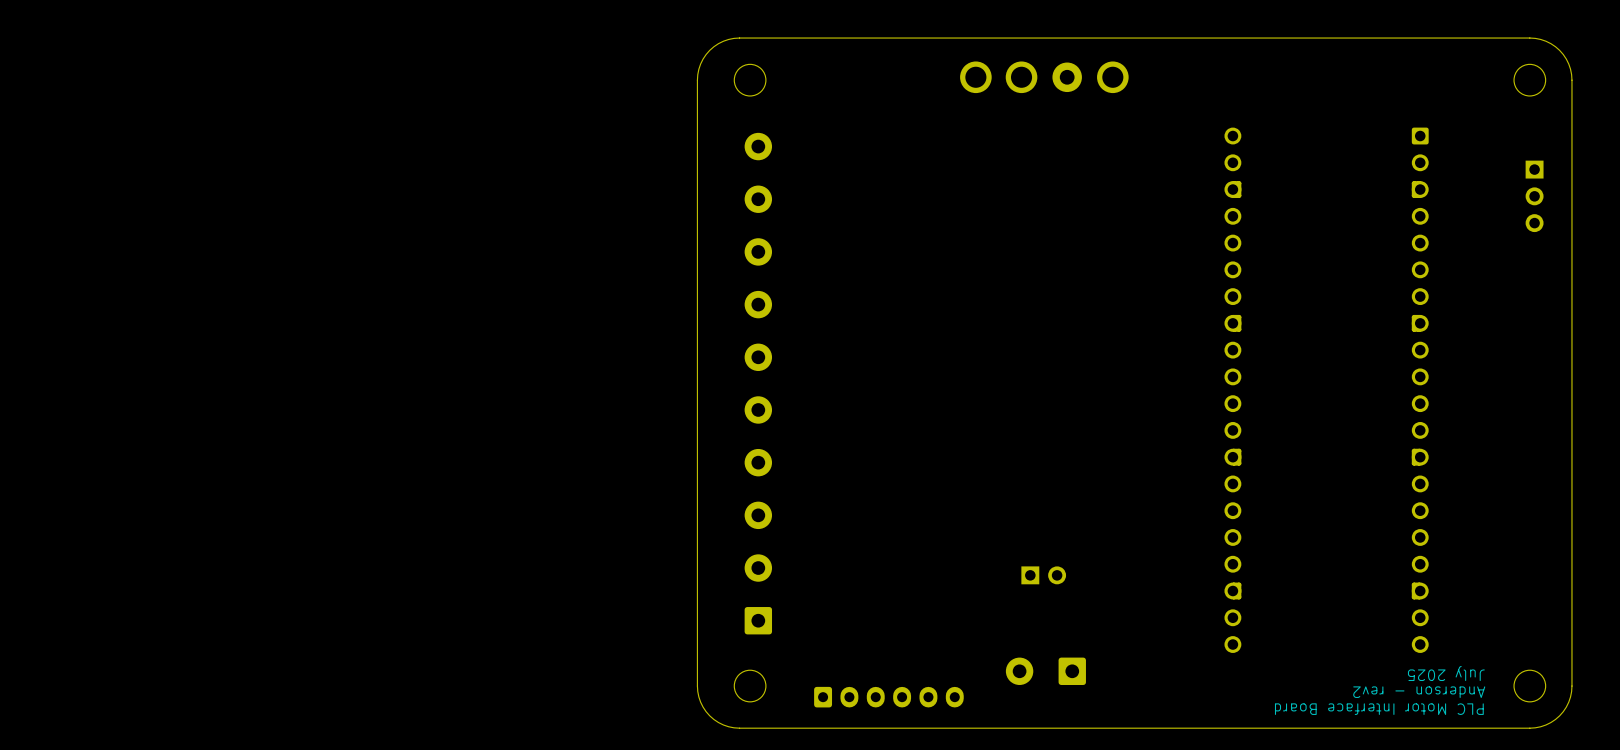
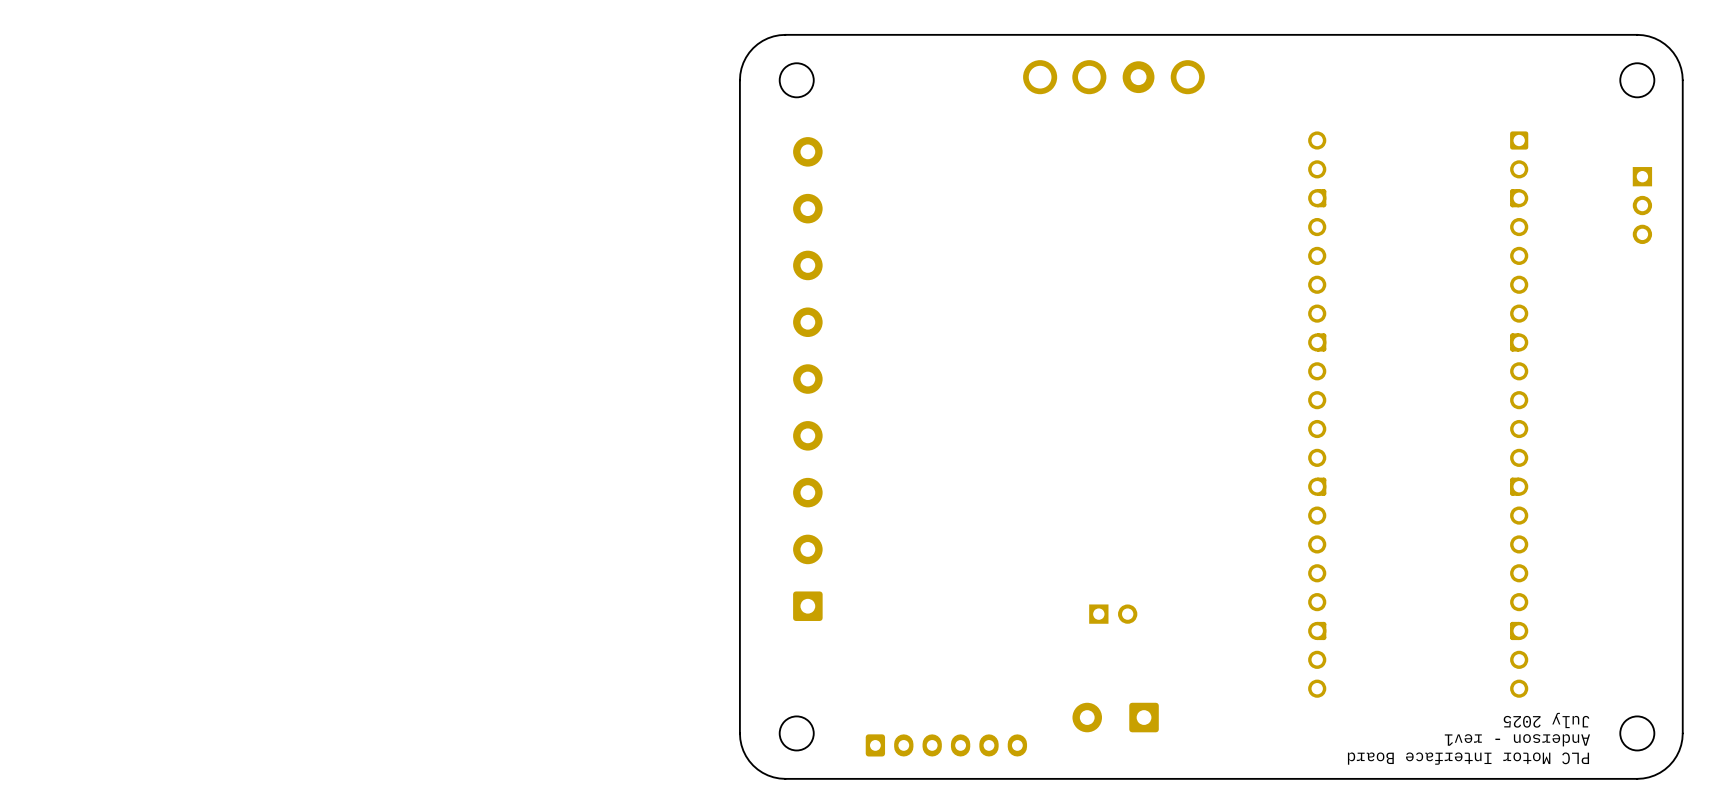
part: none -> (807, 379)
part: (758, 383) -> none
text: Anderson - rev2 (1419, 692) -> Anderson - rev1 (1517, 740)

